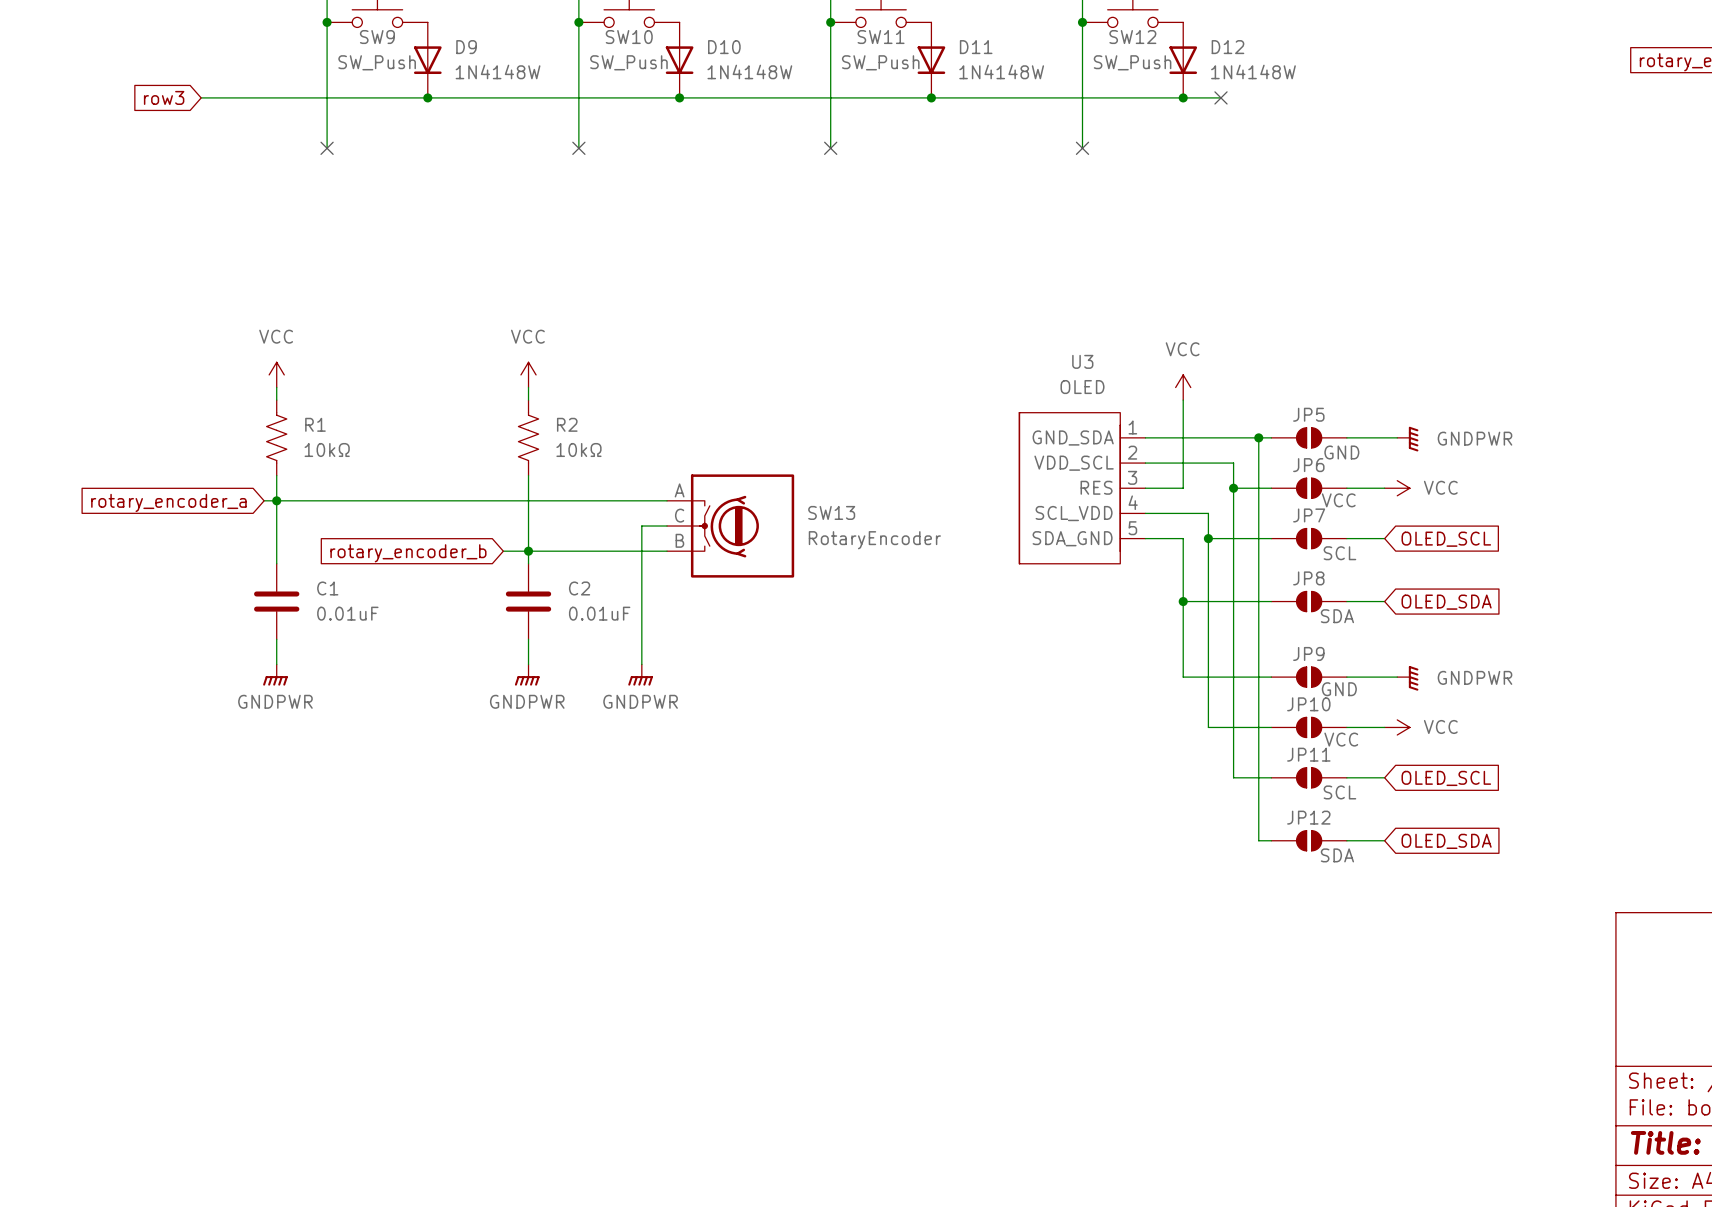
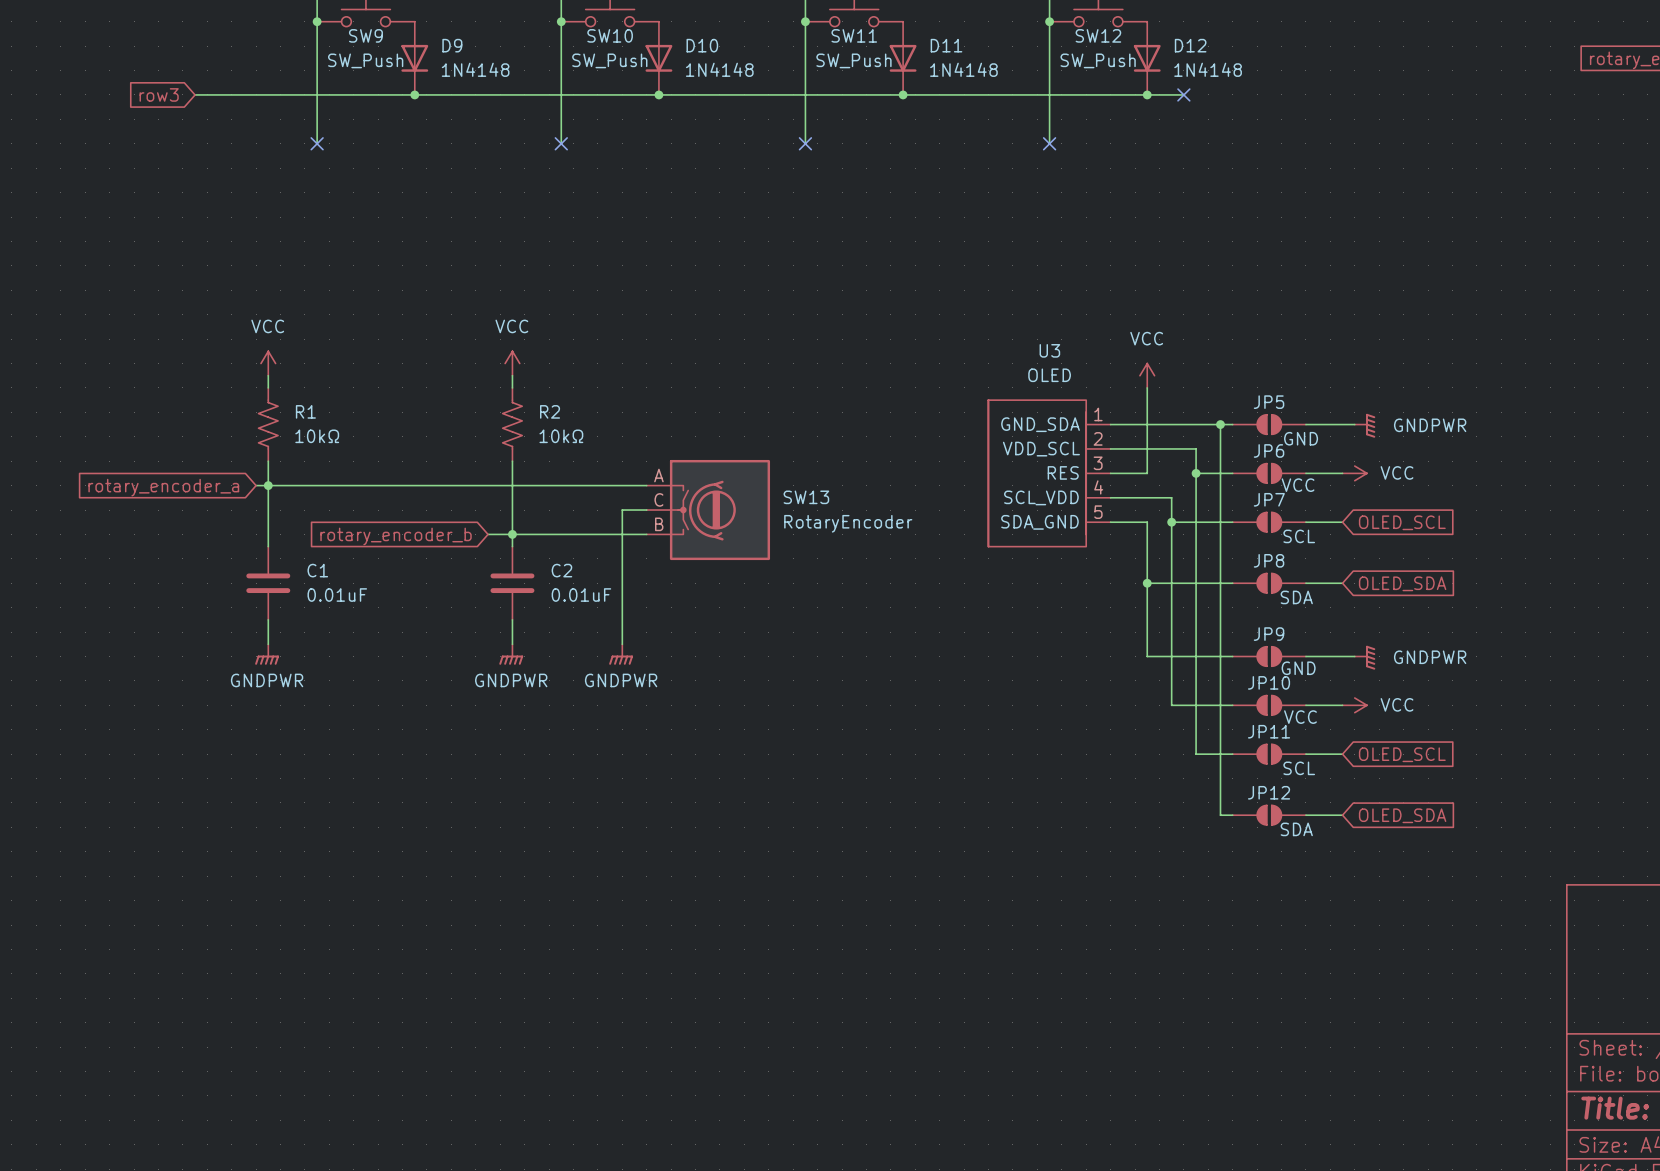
D9 value: 1N4148W (498, 71) -> 1N4148 (475, 69)
D10 value: 1N4148W (749, 71) -> 1N4148 (719, 69)
D11 value: 1N4148W (1001, 71) -> 1N4148 (963, 69)
D12 value: 1N4148W (1253, 71) -> 1N4148 (1208, 69)

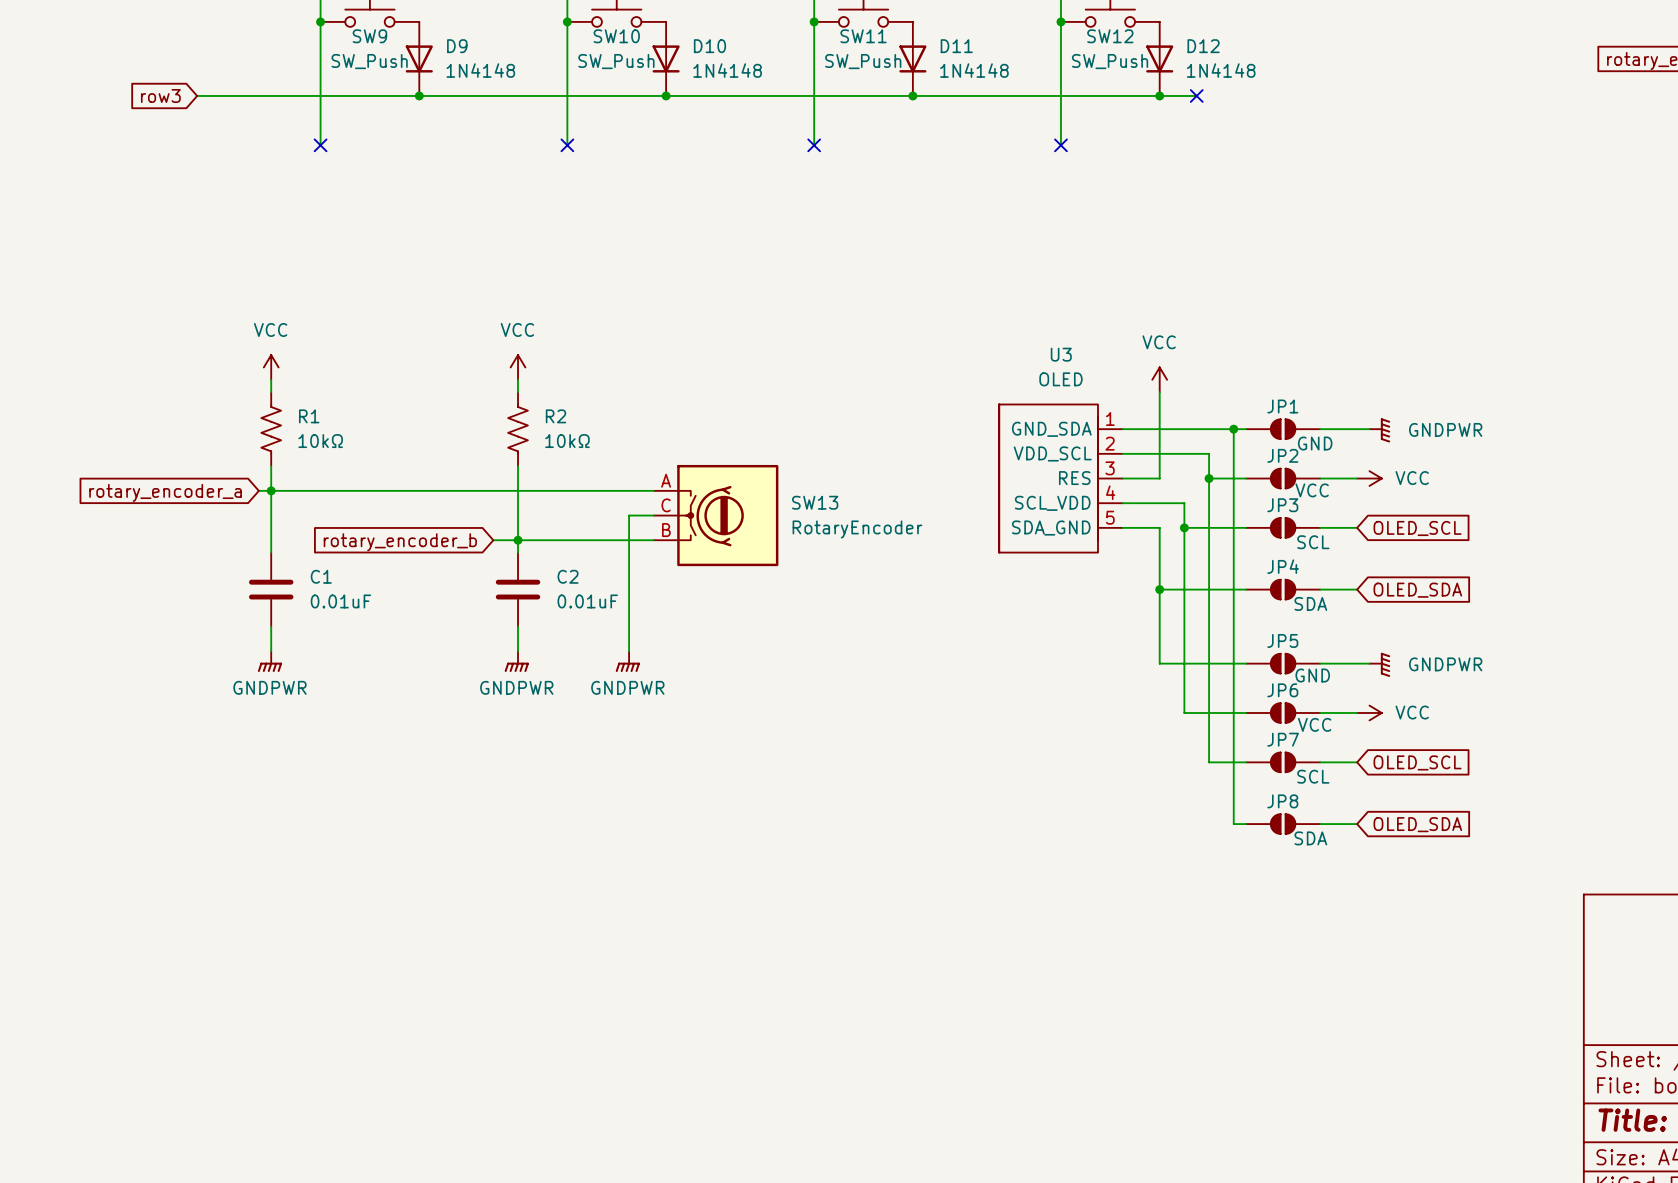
JP5 name: JP5 (1269, 402) -> JP1 (1282, 406)
JP6 name: JP6 (1269, 450) -> JP2 (1282, 455)
JP7 name: JP7 (1269, 499) -> JP3 (1282, 505)
JP8 name: JP8 (1269, 560) -> JP4 (1283, 566)
JP9 name: JP9 (1269, 634) -> JP5 (1282, 640)
JP10 name: JP10 (1269, 682) -> JP6 (1282, 690)
JP11 name: JP11 (1269, 731) -> JP7 (1283, 739)
JP12 name: JP12 (1269, 792) -> JP8 (1282, 801)

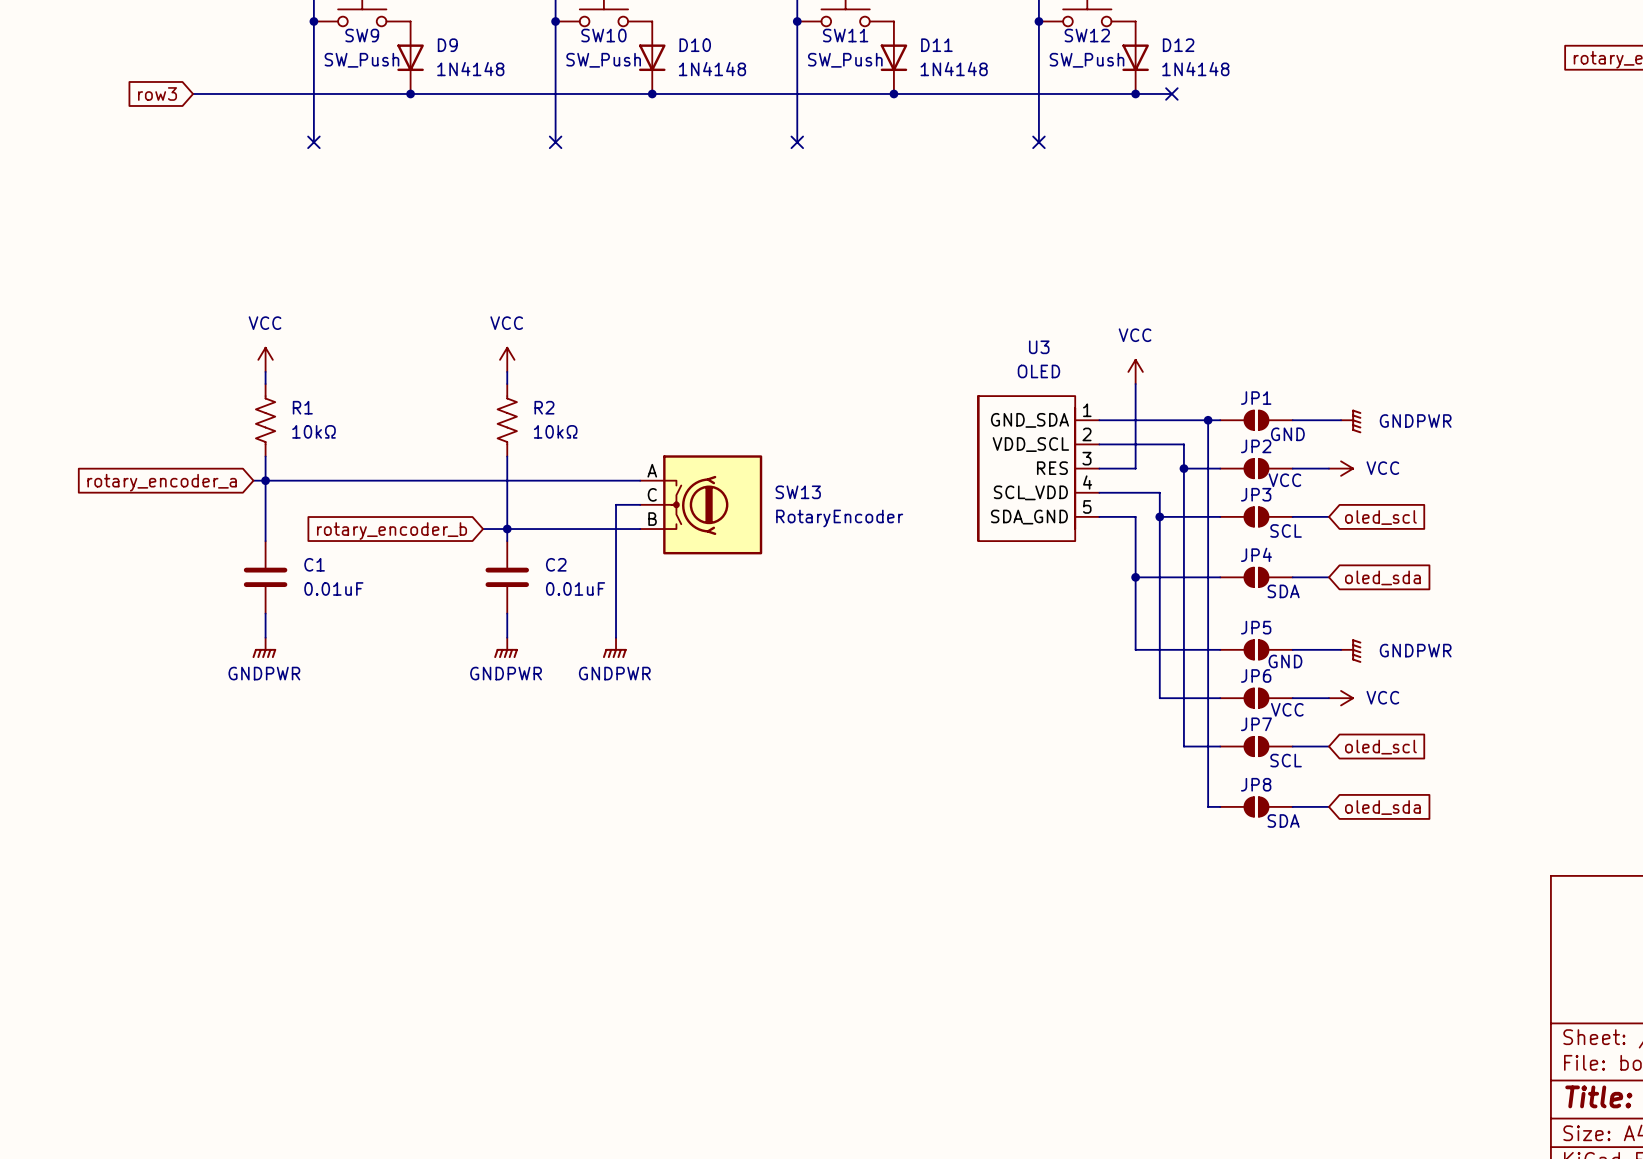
global label: OLED_SCL (1417, 528) -> oled_scl (1380, 517)
global label: OLED_SDA (1417, 590) -> oled_sda (1382, 577)
global label: OLED_SCL (1417, 762) -> oled_scl (1380, 747)
global label: OLED_SDA (1417, 824) -> oled_sda (1382, 807)

